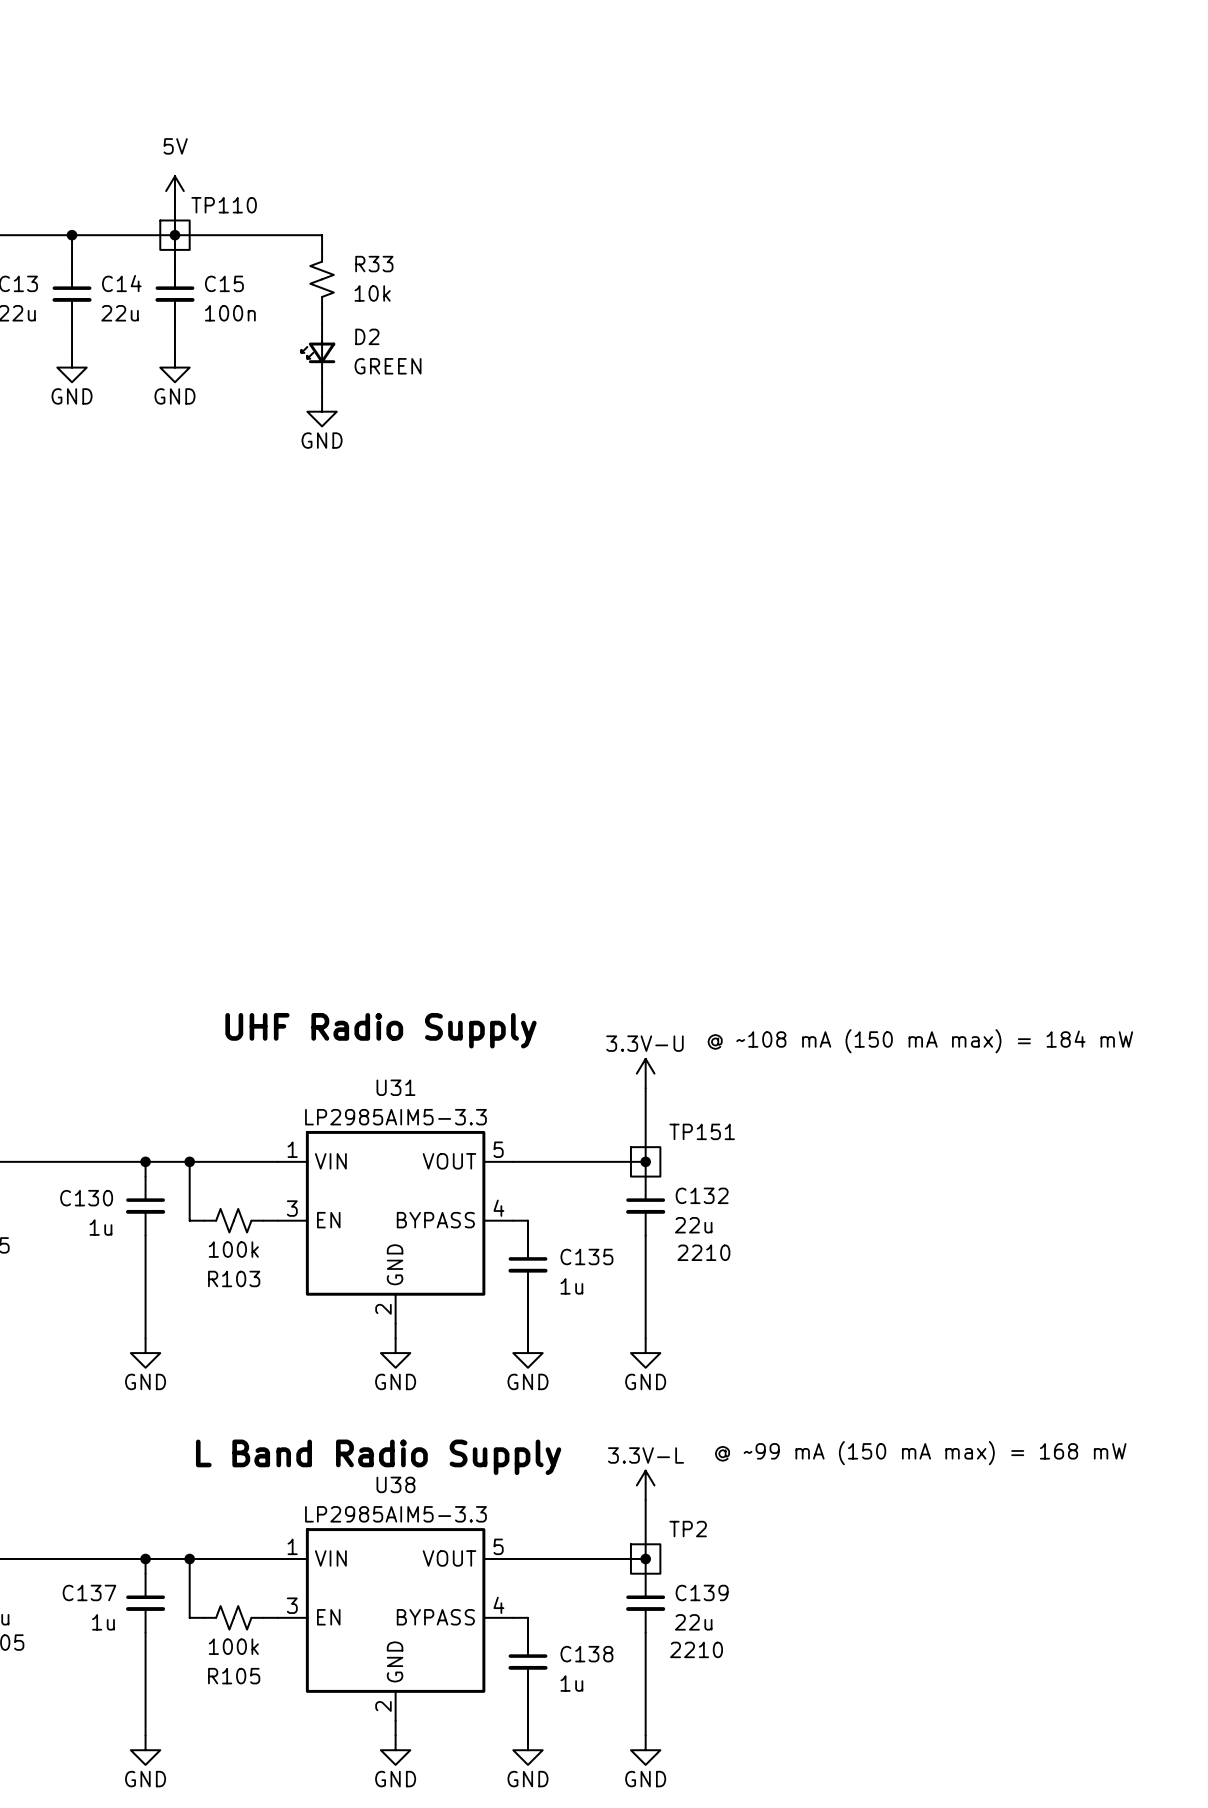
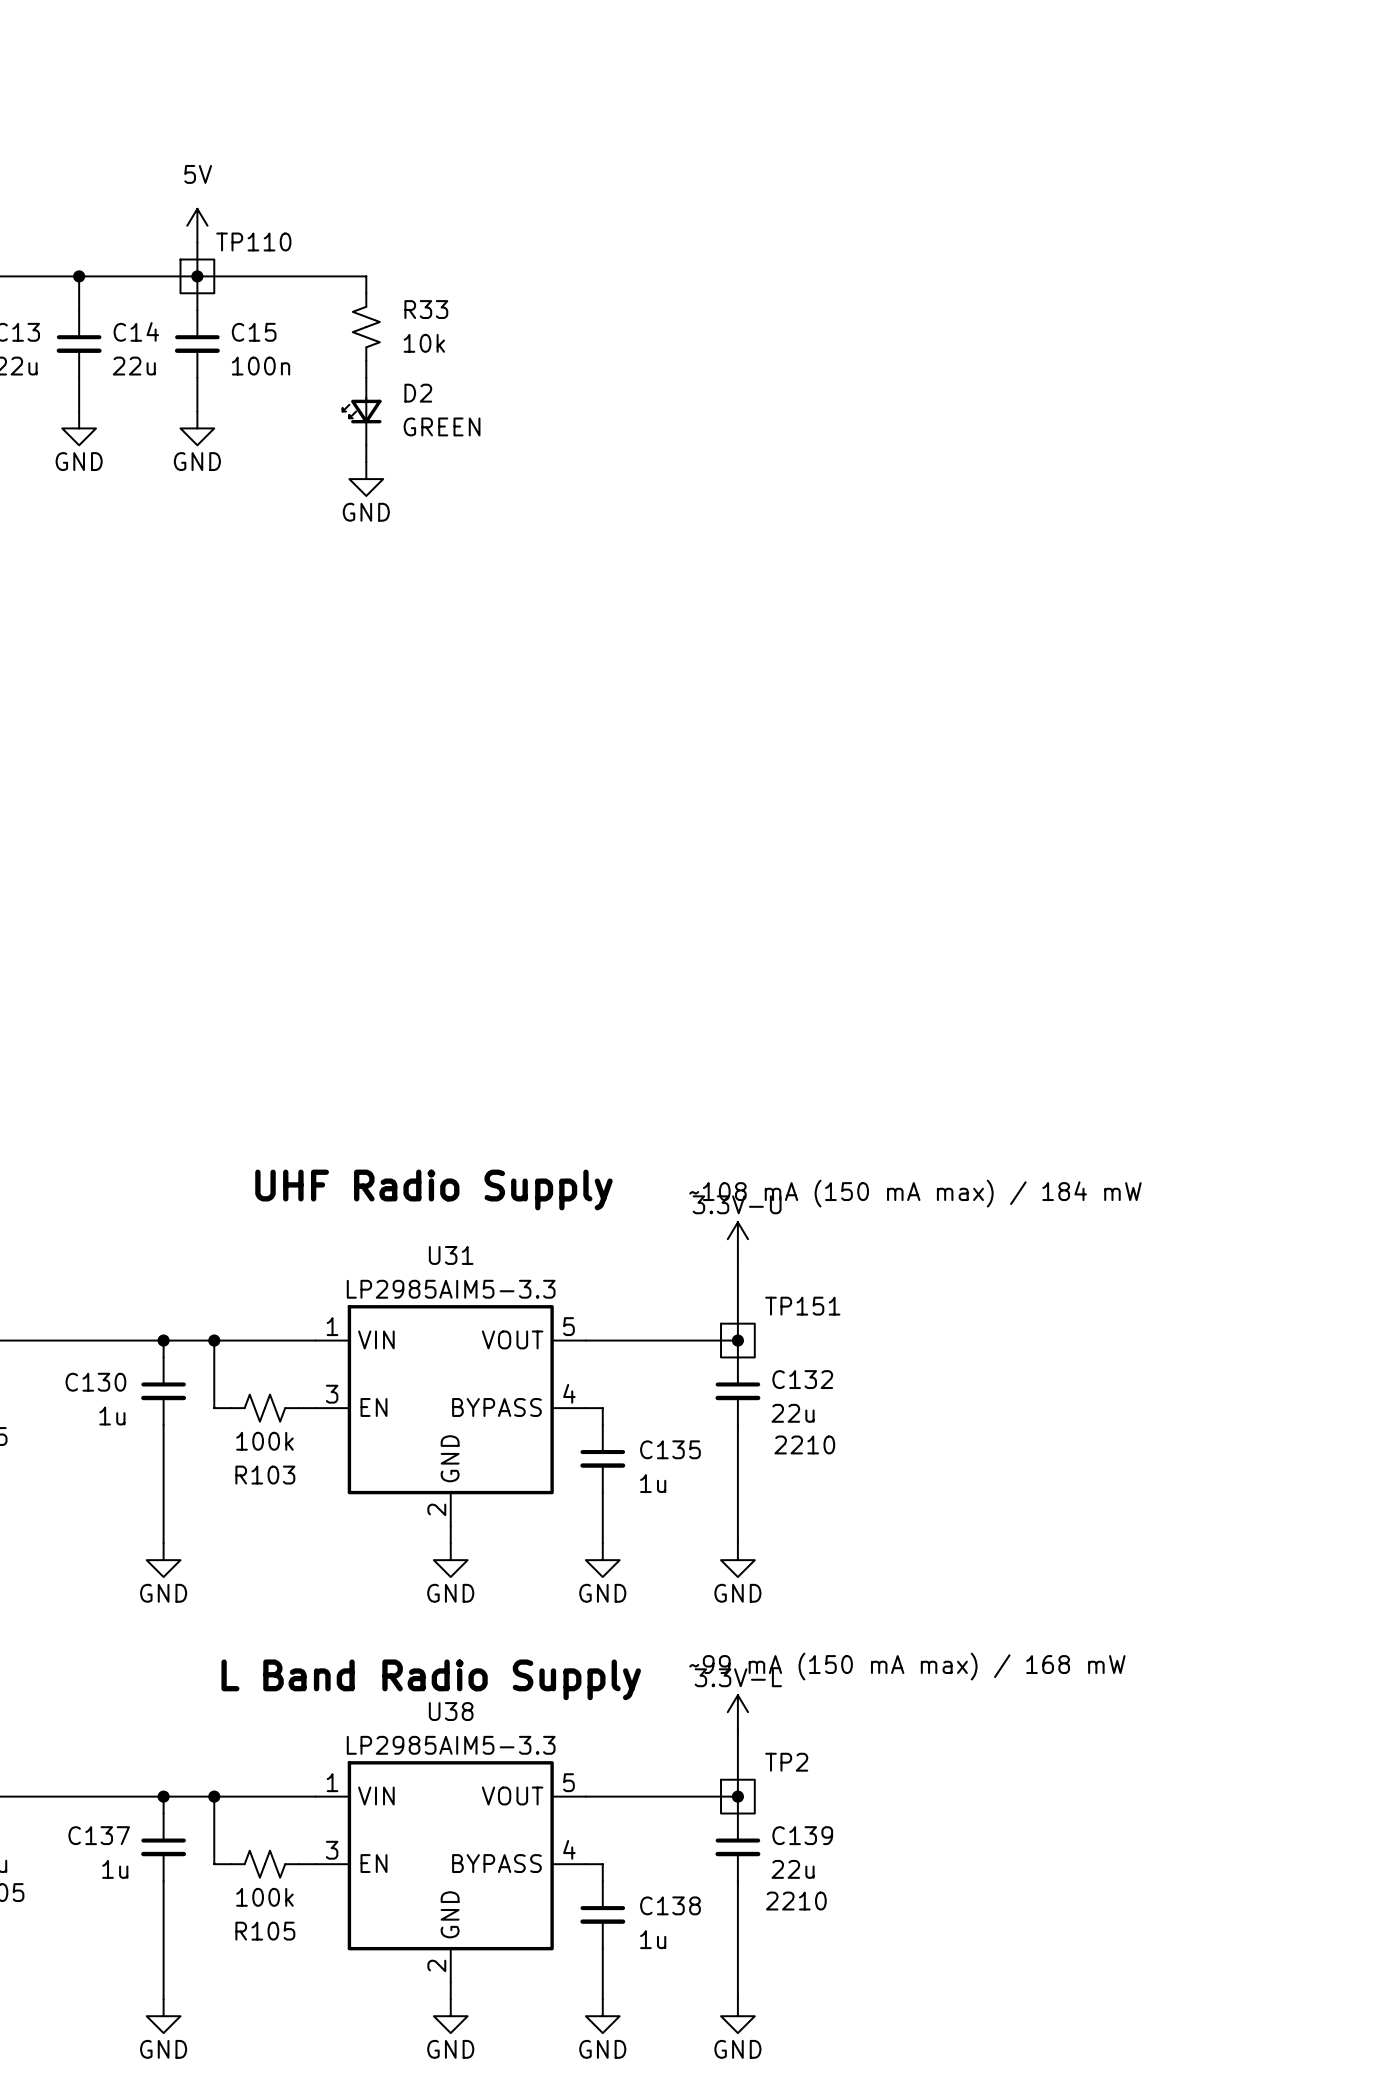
text: @ ~108 mA (150 mA max) = 184 mW (920, 1041) -> ~108 mA (150 mA max) / 184 mW (915, 1193)
text: @ ~99 mA (150 mA max) = 168 mW (920, 1453) -> ~99 mA (150 mA max) / 168 mW (907, 1666)

